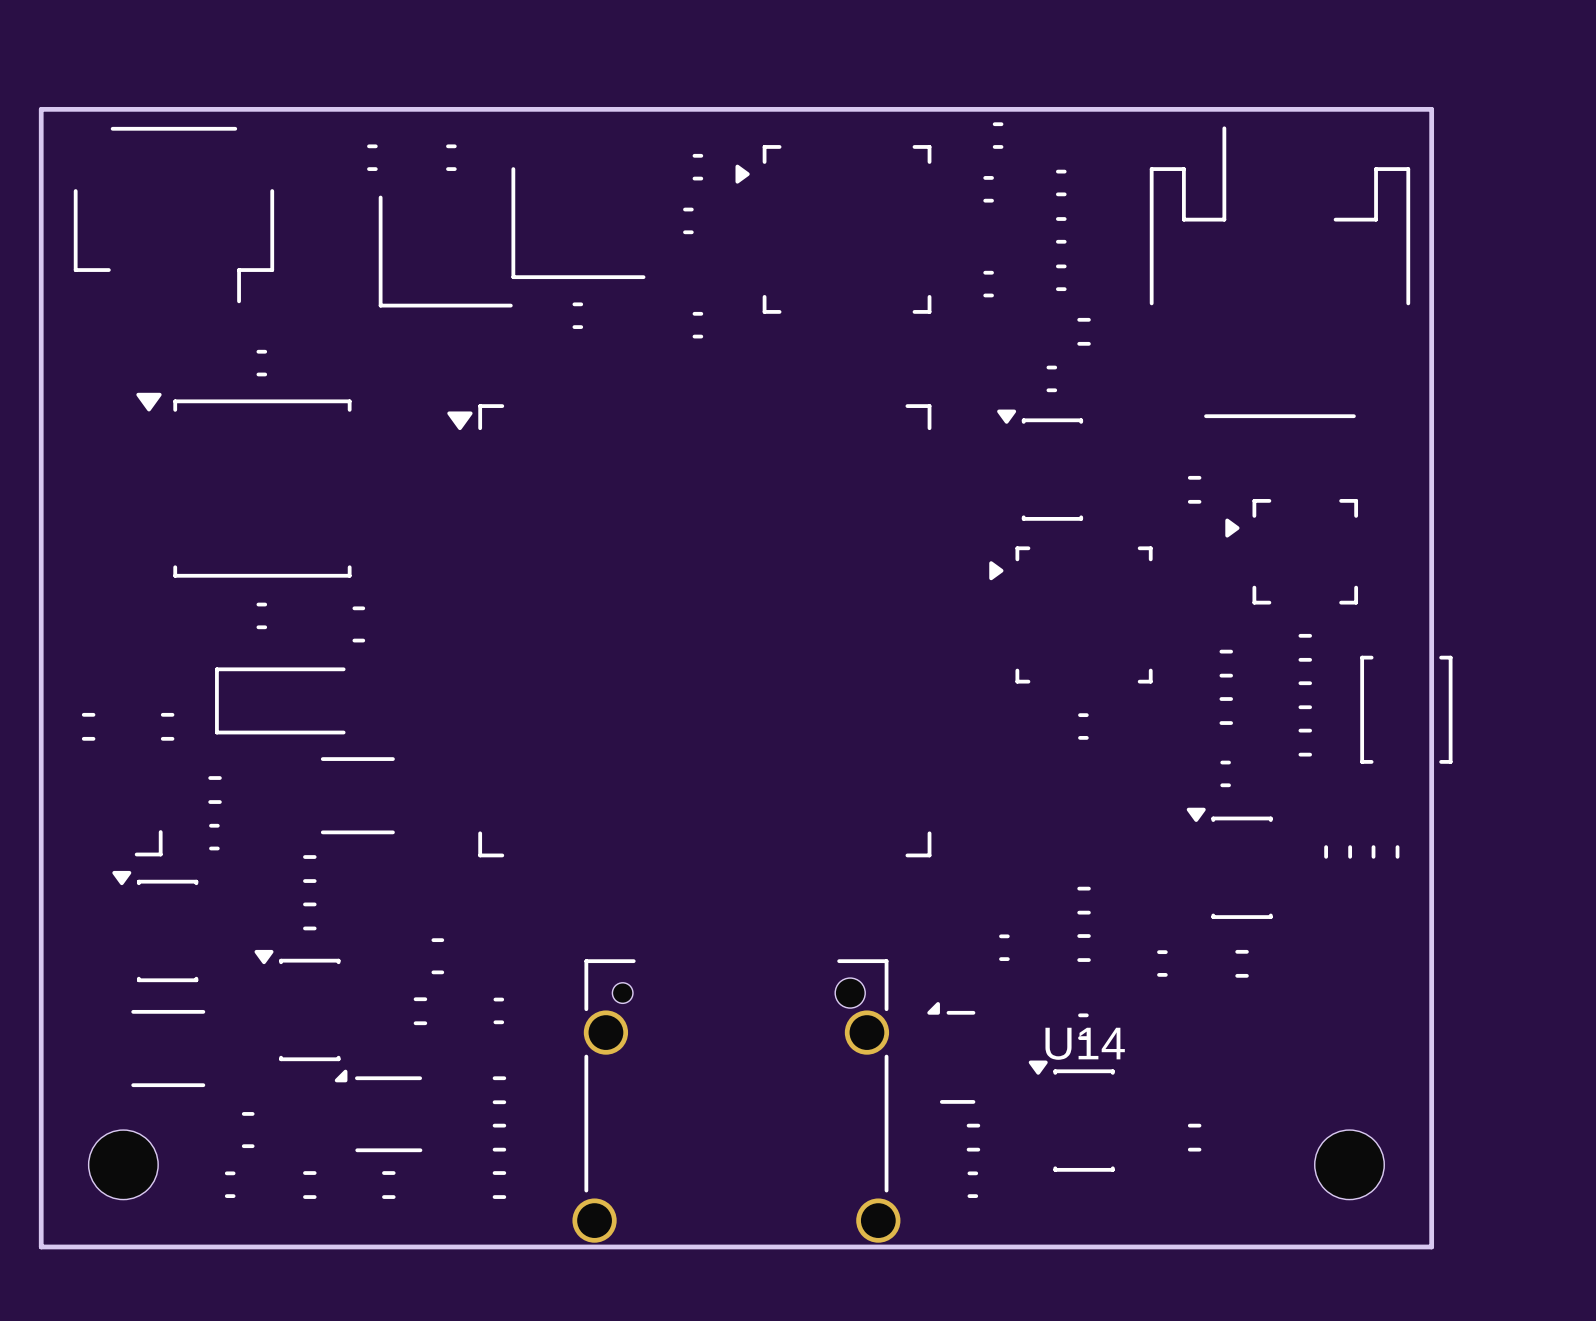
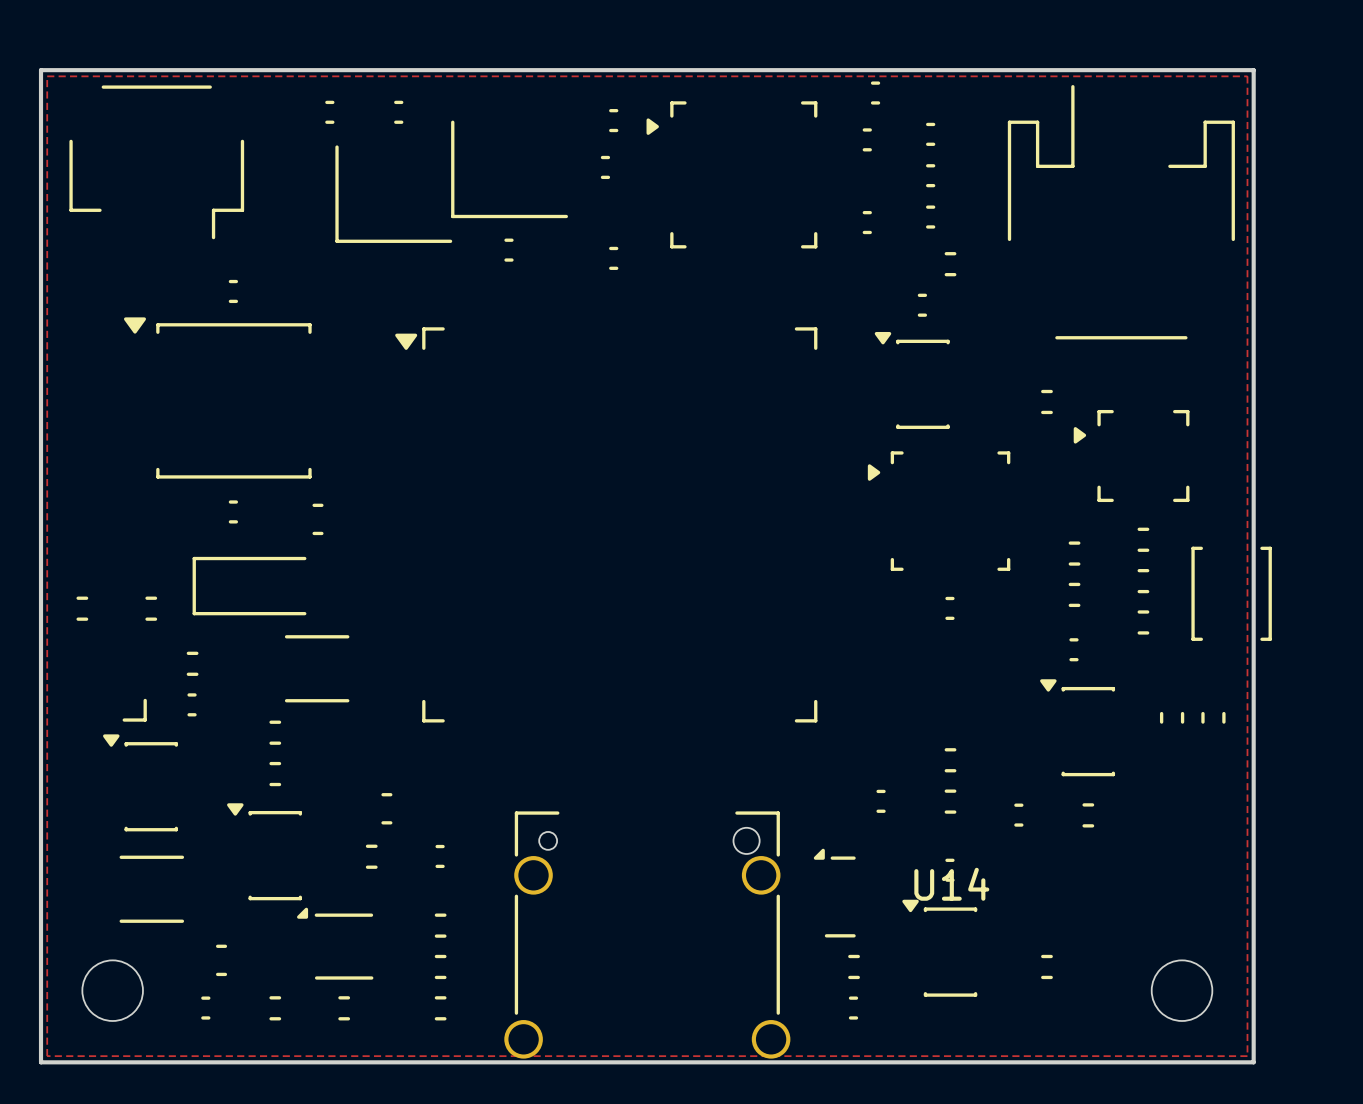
zone outline: none -> (47, 76) (1247, 76) (1247, 1056) (47, 1056) (47, 76)

